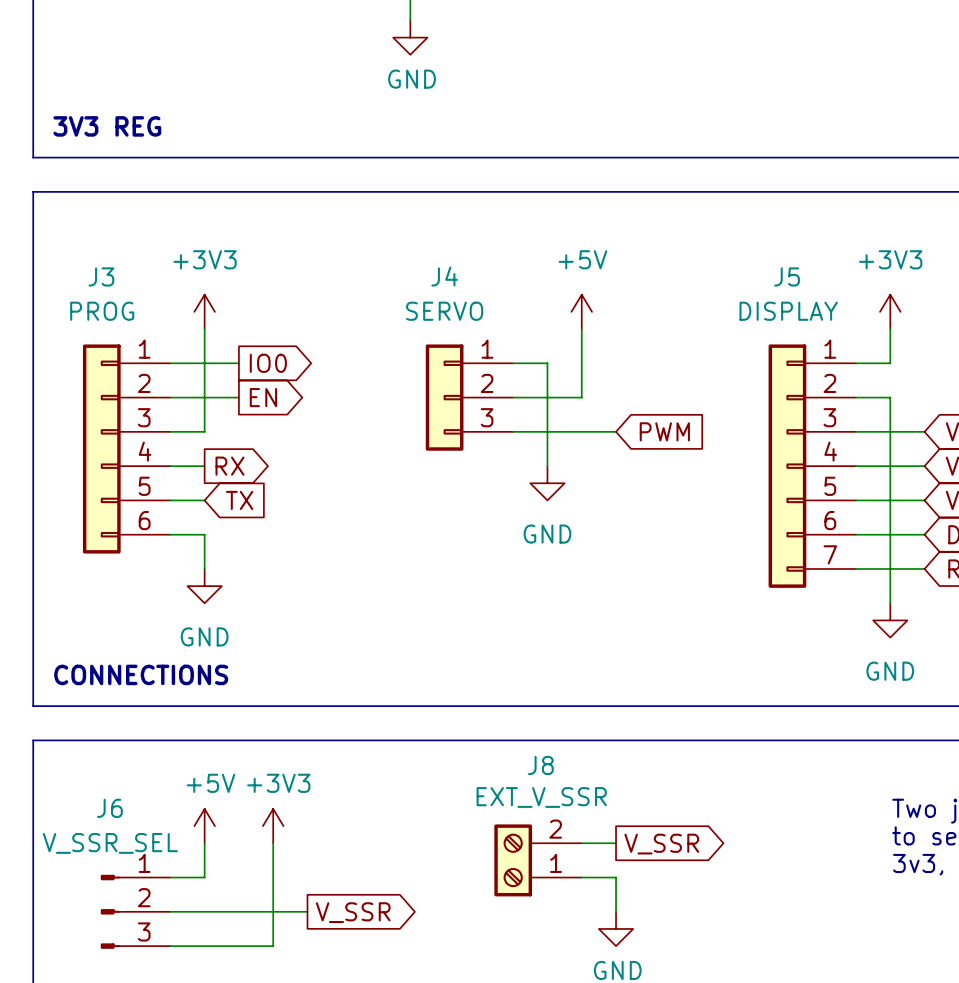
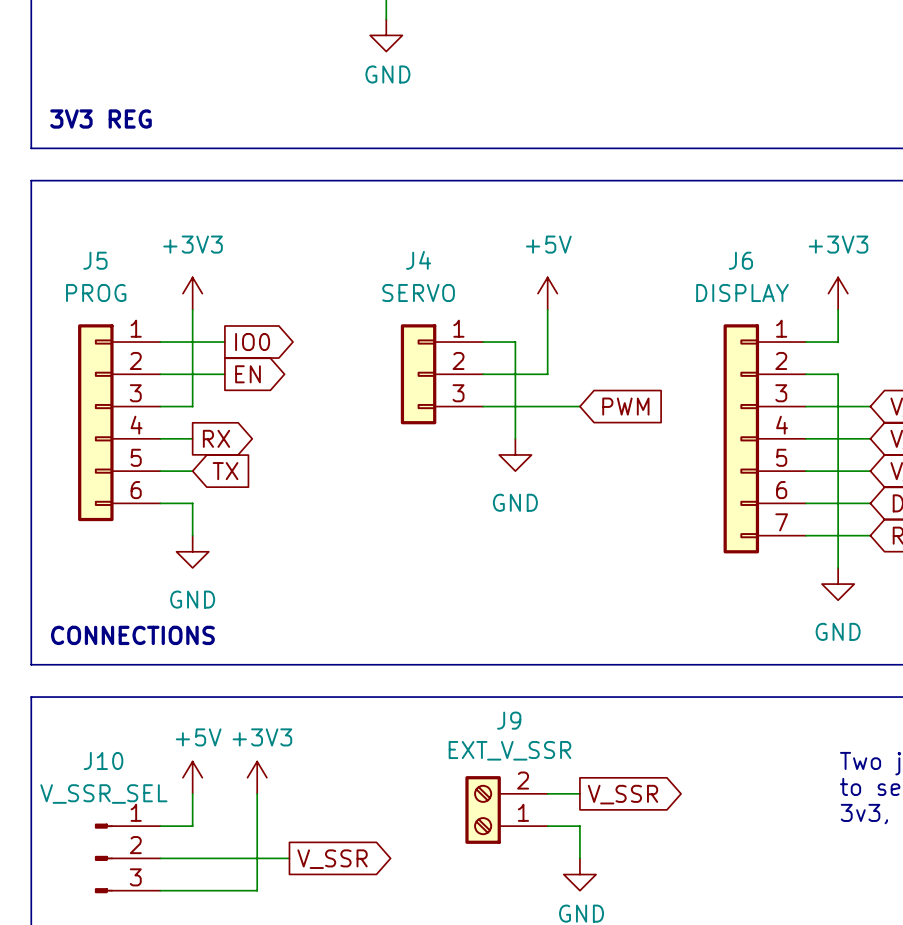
J3 name: J3 (101, 276) -> J5 (95, 260)
J5 name: J5 (787, 276) -> J6 (740, 260)
J8 name: J8 (540, 765) -> J9 (509, 720)
J6 name: J6 (109, 808) -> J10 (103, 760)

